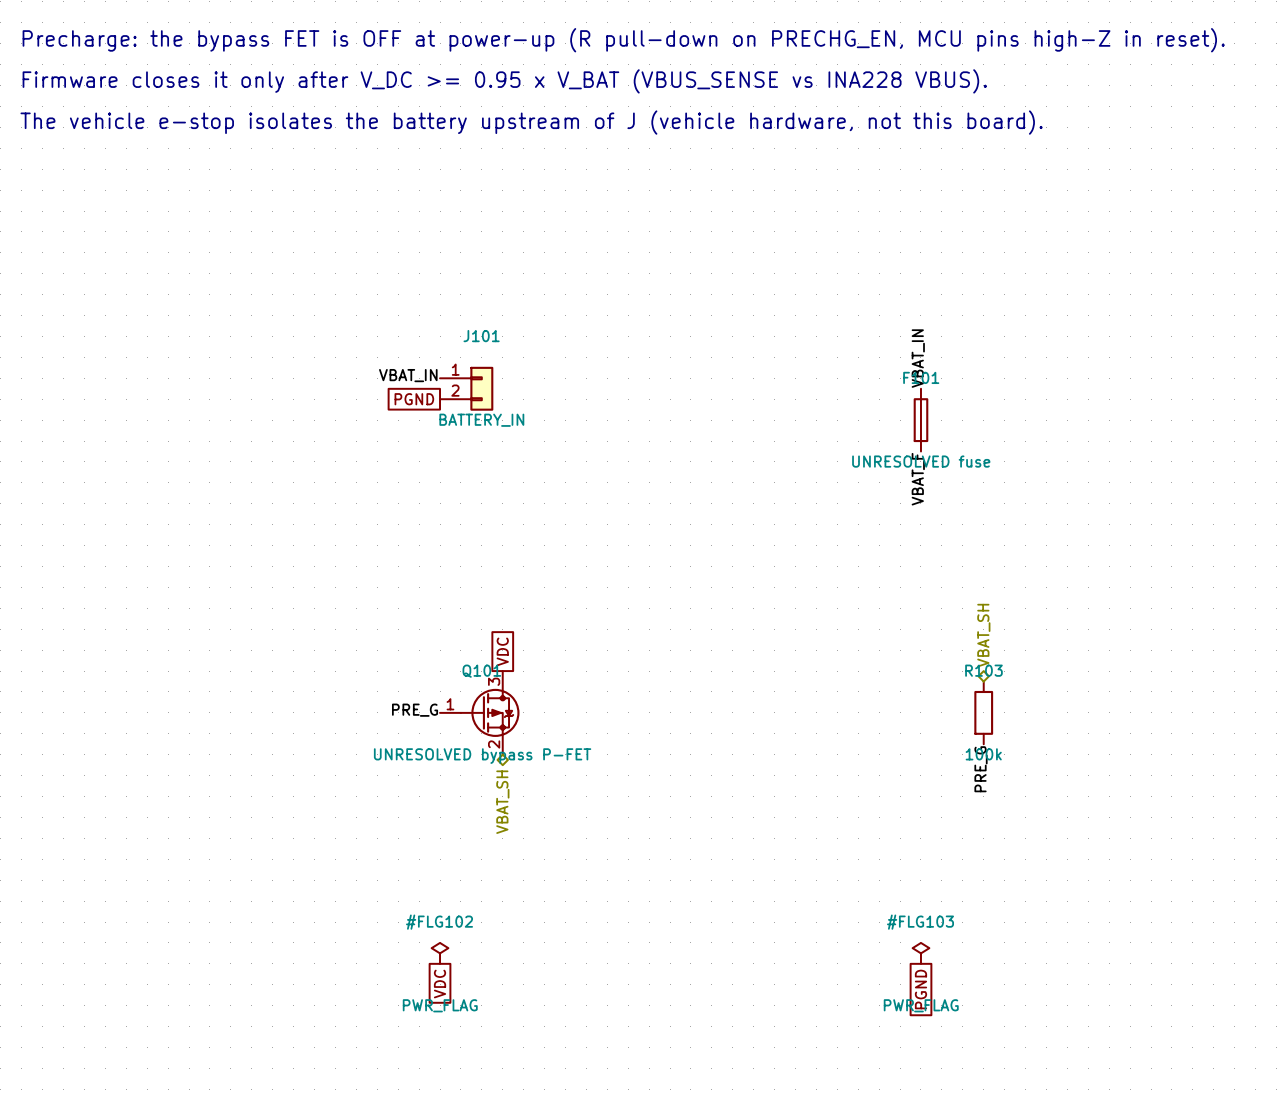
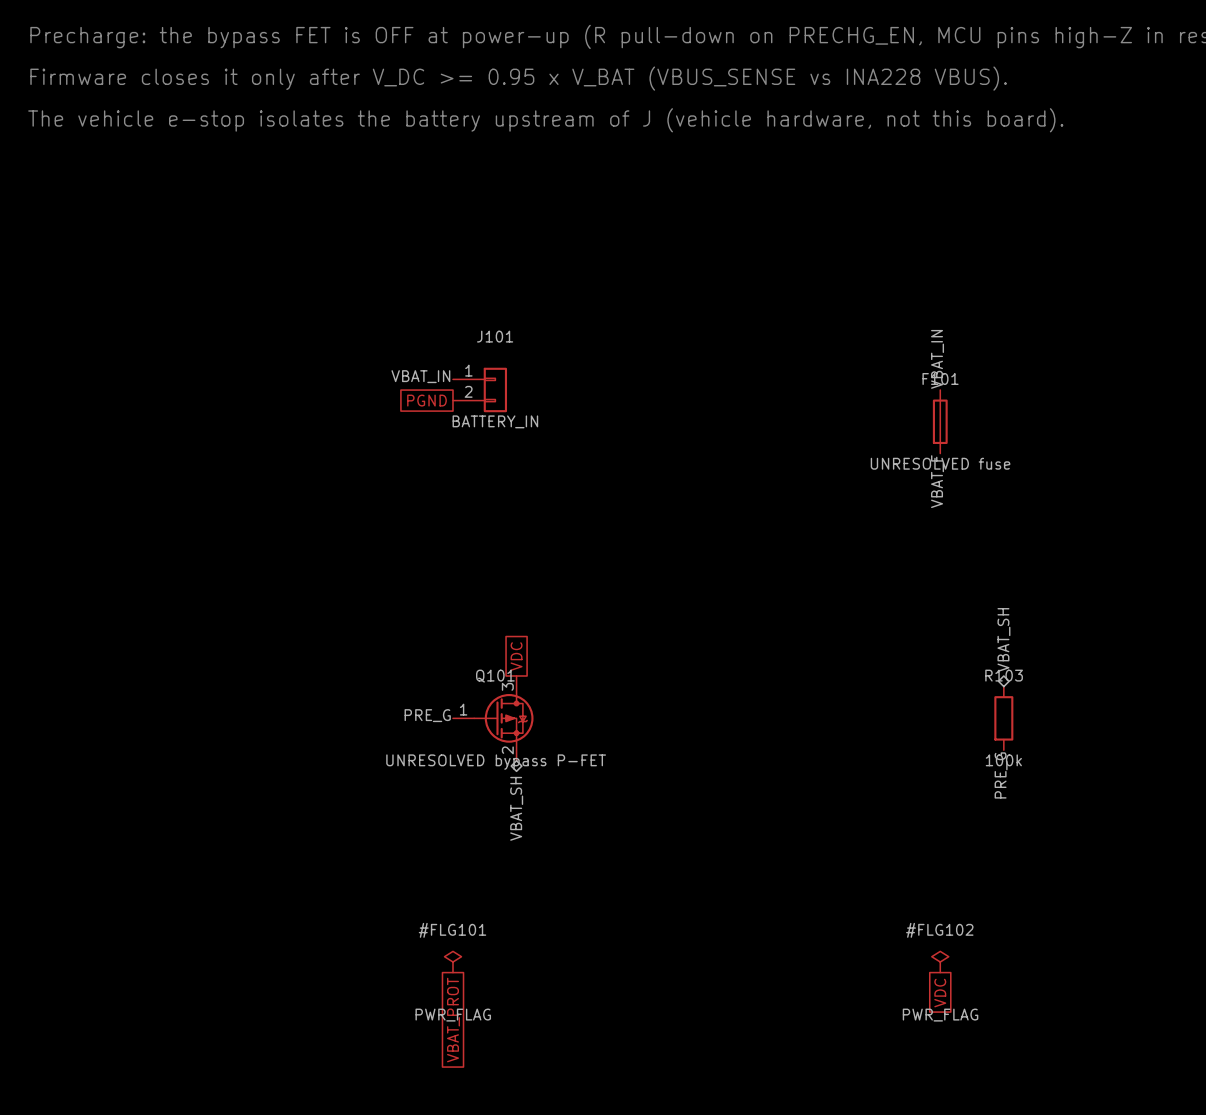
#FLG102 name: #FLG102 (439, 922) -> #FLG101 (452, 930)
#FLG103 name: #FLG103 (920, 922) -> #FLG102 (939, 930)
global label: VDC (440, 984) -> VBAT_PROT (453, 1020)
global label: PGND (920, 989) -> VDC (940, 993)

